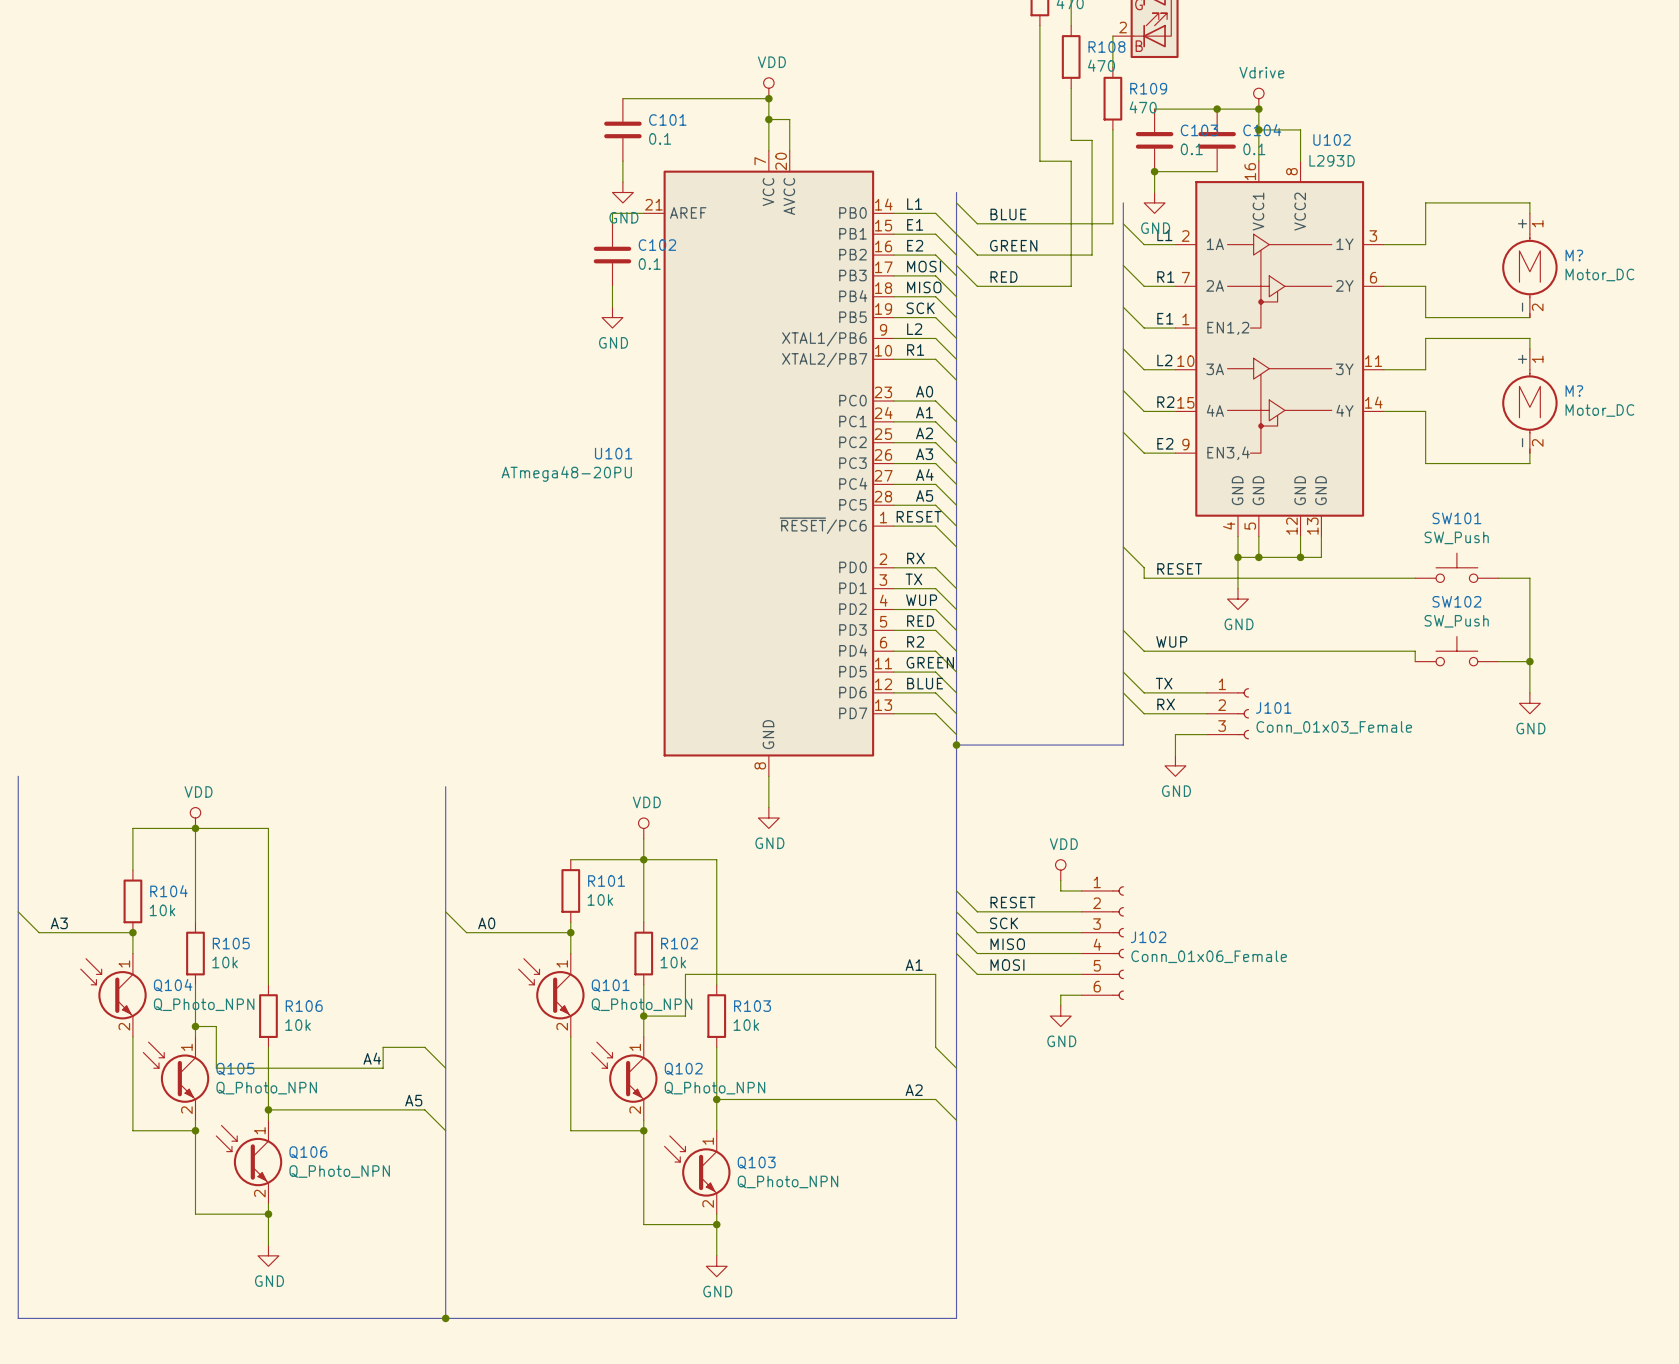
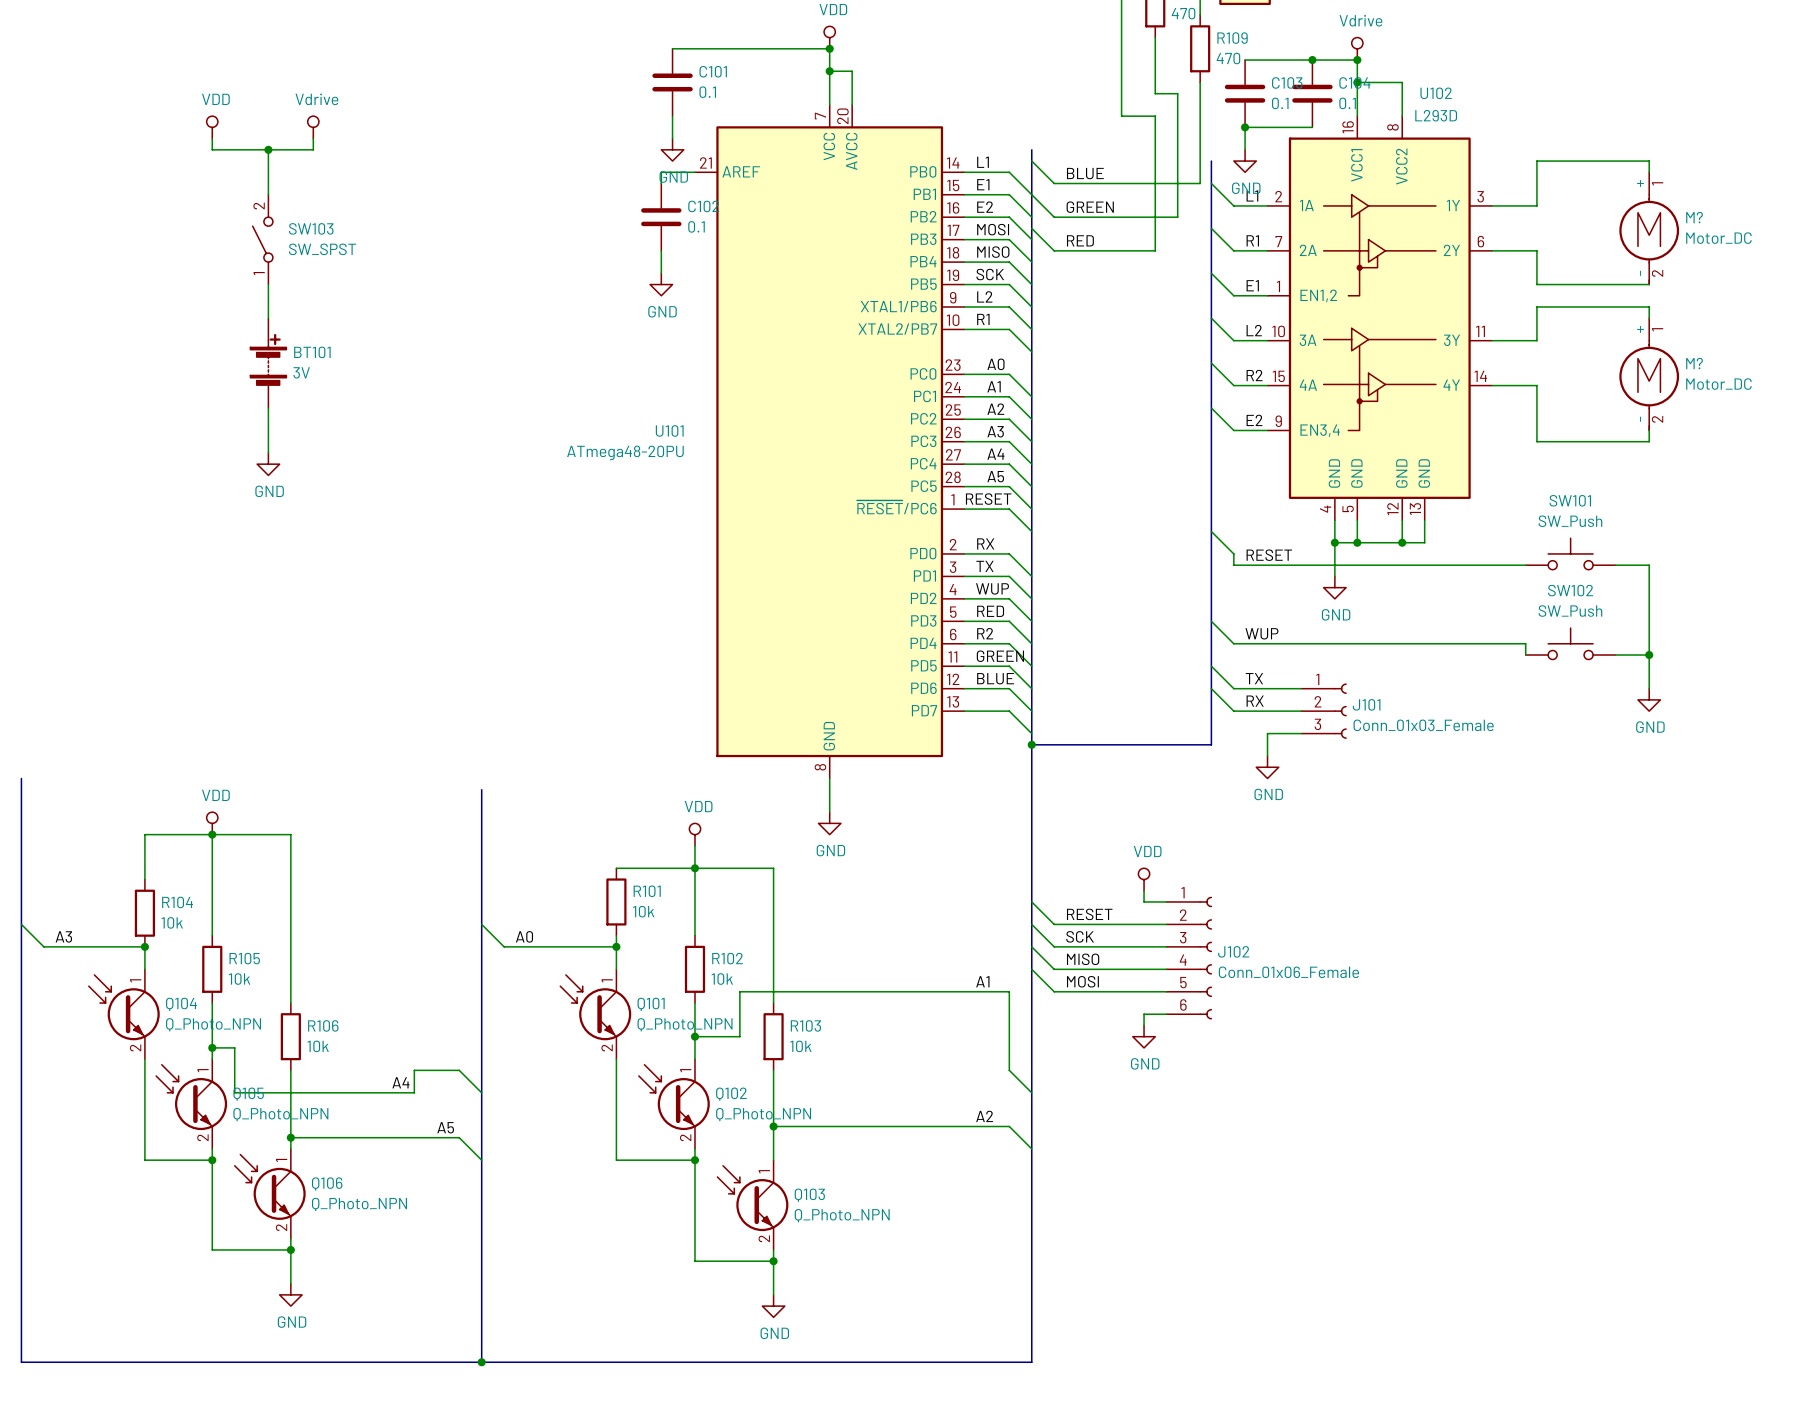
power symbol: none -> VDD (212, 127)
power symbol: none -> Vdrive (313, 127)
wire: none -> (212, 138) (212, 149) (313, 149) (313, 138)
wire: none -> (268, 149) (268, 194)
junction: none -> (268, 149)
SW103: none -> SW_SPST (262, 239)
wire: none -> (268, 284) (268, 318)
BT101: none -> 3V (268, 363)
wire: none -> (268, 408) (268, 452)
power symbol: none -> GND (268, 464)

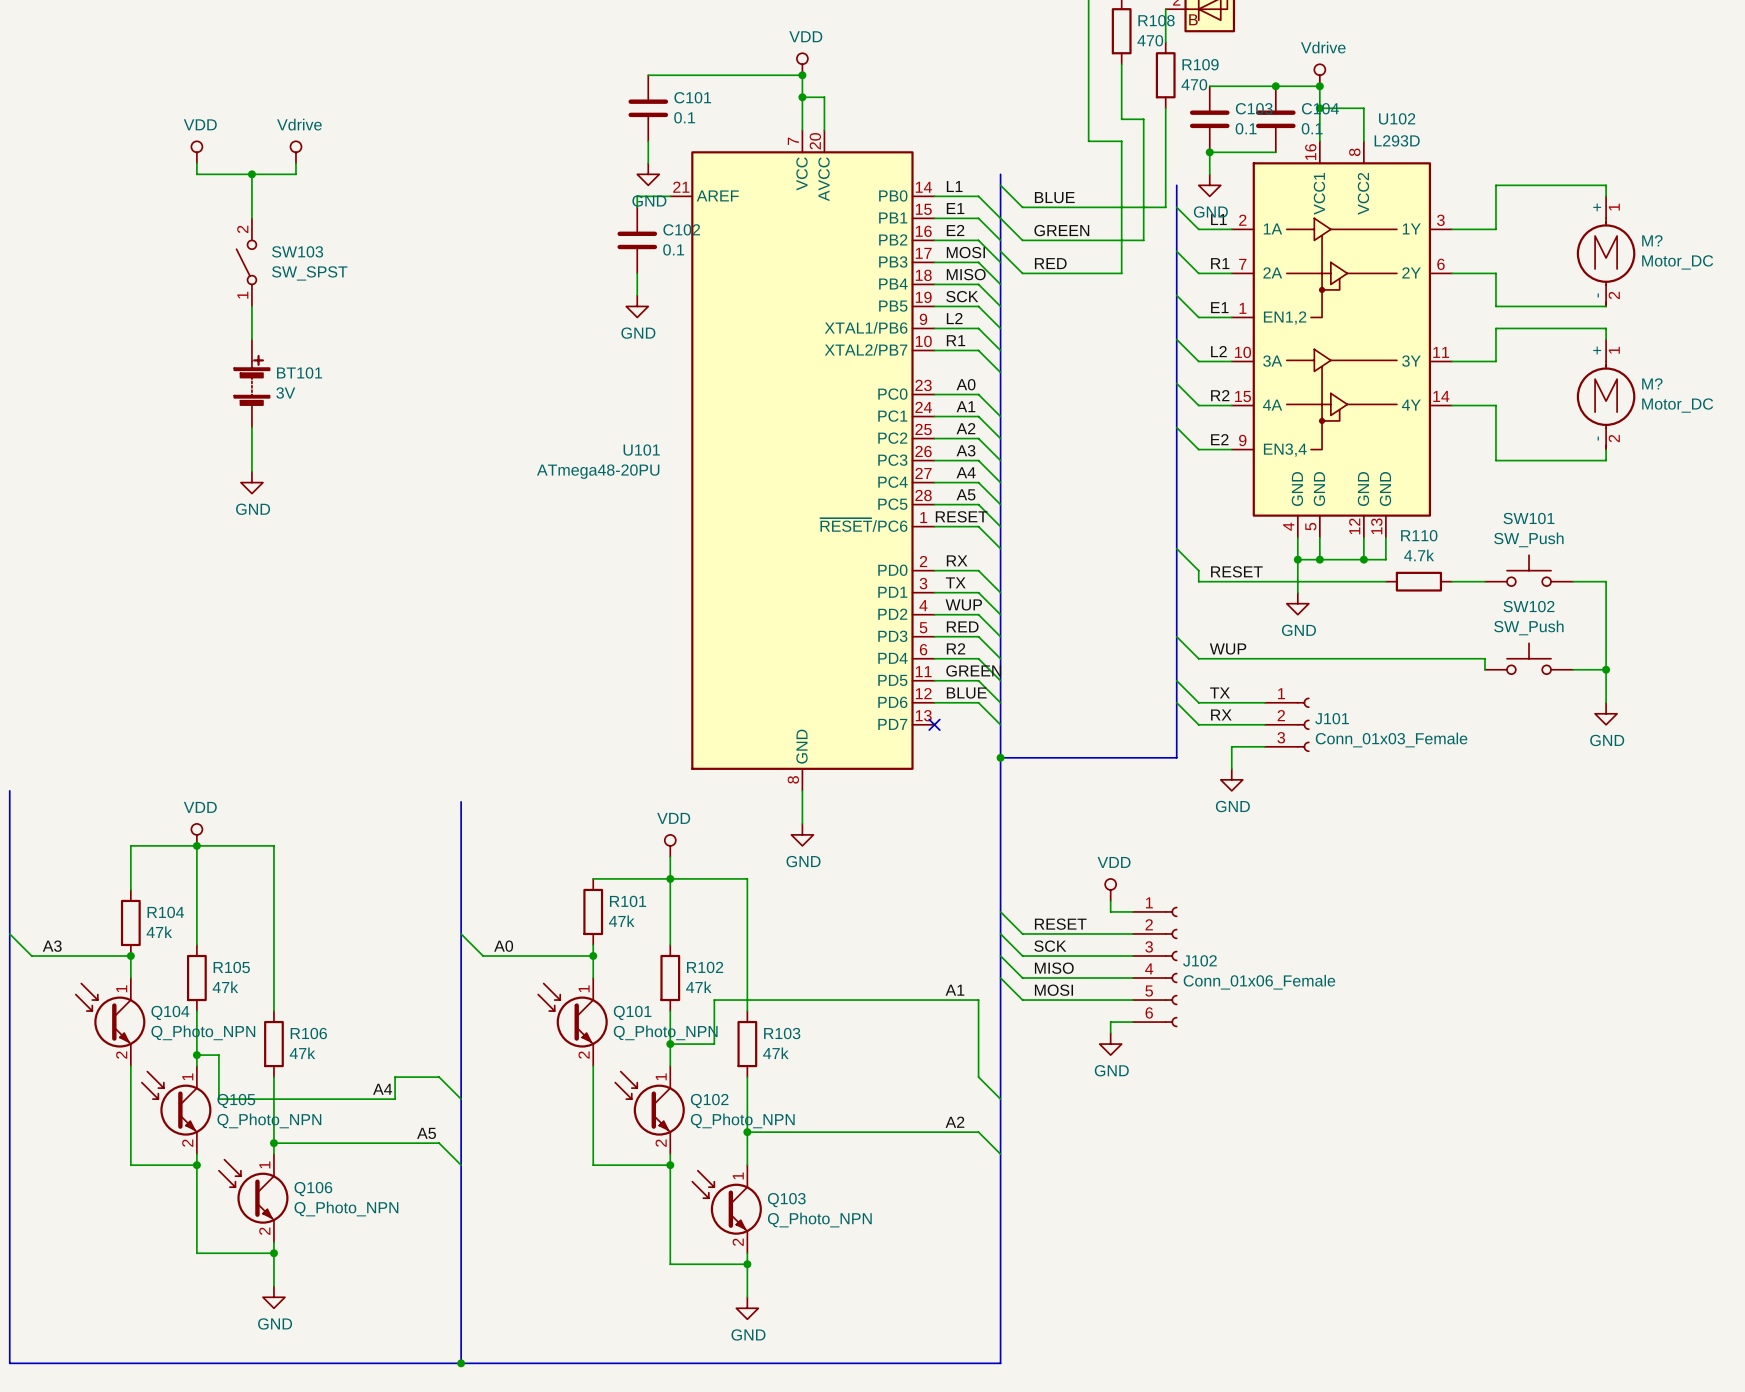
wire: (1424, 565) (1492, 565) -> none
R110: none -> 4.7k (1418, 581)
wire: (964, 711) (1009, 711) (1031, 733) -> none
no-connect mark: none -> (934, 724)
R101 value: 10k (643, 911) -> 47k (621, 921)
R104 value: 10k (172, 922) -> 47k (159, 932)
R105 value: 10k (239, 979) -> 47k (225, 987)
R102 value: 10k (722, 979) -> 47k (698, 987)
R106 value: 10k (318, 1046) -> 47k (302, 1053)
R103 value: 10k (800, 1046) -> 47k (775, 1053)

